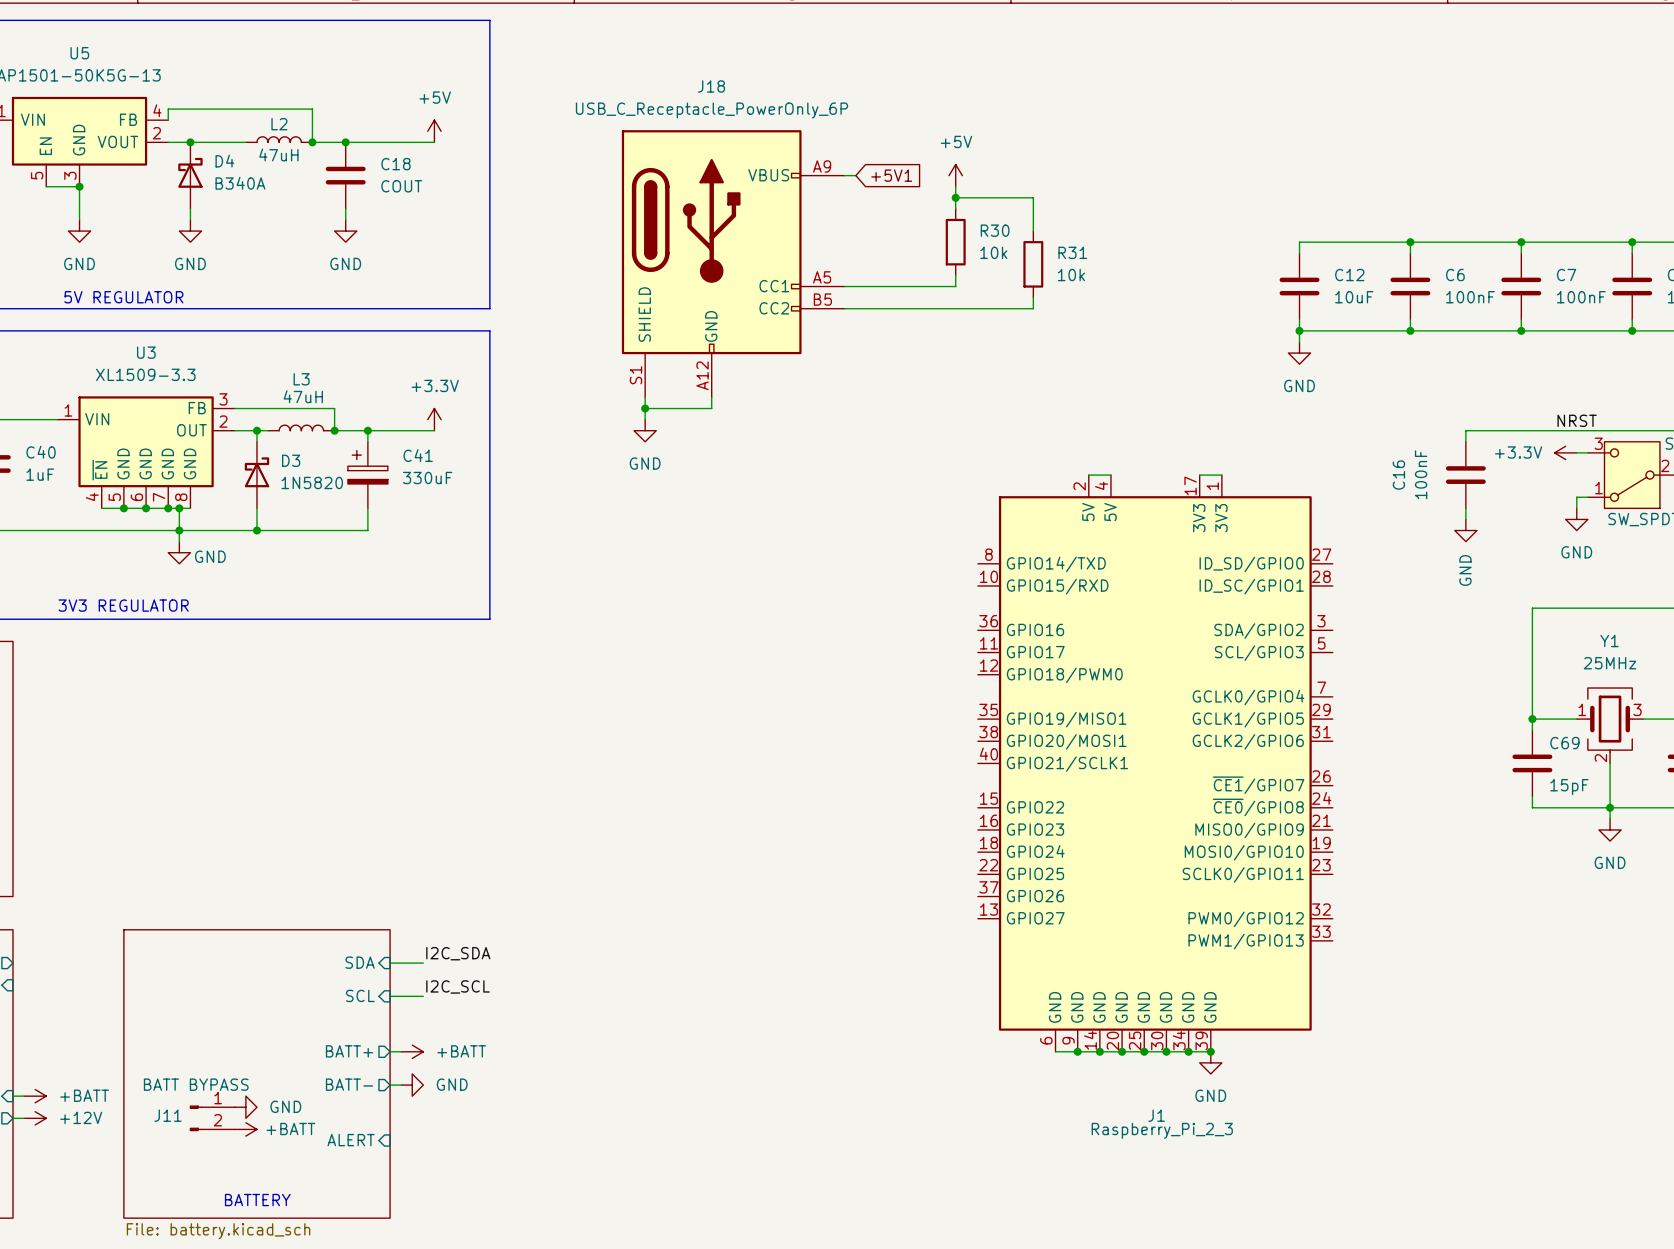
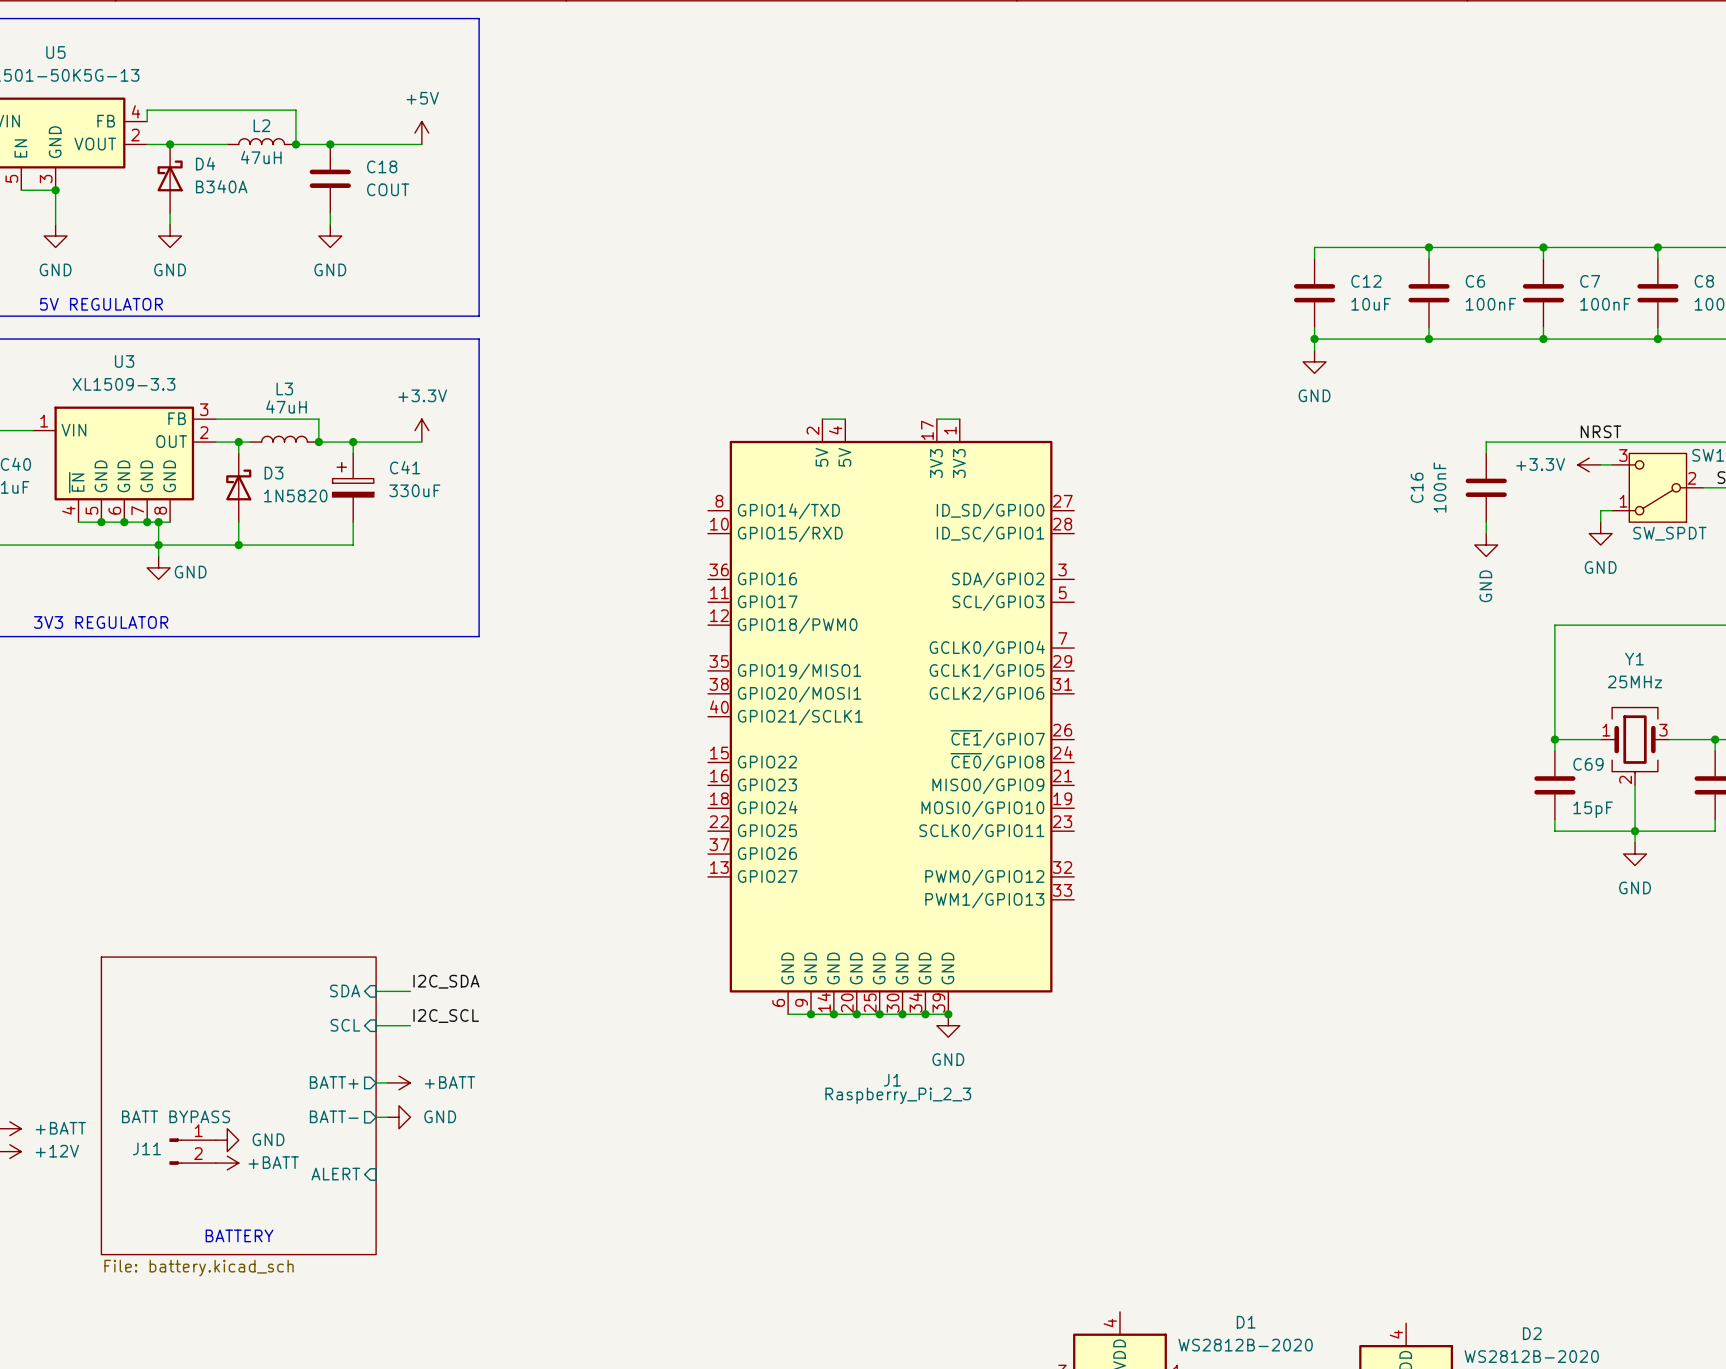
wire: (844, 175) (855, 175) -> none
global label: +5V1 (891, 175) -> none
power symbol: +5V (955, 175) -> none
wire: (955, 186) (955, 208) -> none
wire: (955, 197) (1033, 197) (1033, 231) -> none
junction: (955, 197) -> none
R30: 10k (955, 242) -> none
J18: USB_C_Receptacle_PowerOnly_6P (733, 263) -> none
R31: 10k (1033, 264) -> none
wire: (955, 275) (955, 286) (844, 286) -> none
wire: (1033, 297) (1033, 308) (844, 308) -> none
wire: (645, 397) (645, 419) -> none
wire: (711, 397) (711, 408) (645, 408) -> none
junction: (645, 408) -> none
wire: none -> (822, 419) (845, 419)
power symbol: GND (645, 430) -> none
wire: (1088, 475) (1110, 475) -> (936, 419) (959, 419)
wire: (1199, 475) (1221, 475) -> none
J1 position: (1155, 763) -> (891, 716)
wire: none -> (788, 1014) (948, 1014)
junction: none -> (810, 1014)
junction: none -> (833, 1014)
junction: none -> (856, 1014)
junction: none -> (879, 1014)
junction: none -> (902, 1014)
junction: none -> (925, 1014)
junction: none -> (948, 1014)
power symbol: none -> GND (948, 1025)
wire: (1055, 1051) (1210, 1051) -> none
junction: (1077, 1051) -> none
junction: (1099, 1051) -> none
junction: (1122, 1051) -> none
junction: (1144, 1051) -> none
junction: (1166, 1051) -> none
junction: (1188, 1051) -> none
junction: (1210, 1051) -> none
power symbol: GND (1210, 1062) -> none

